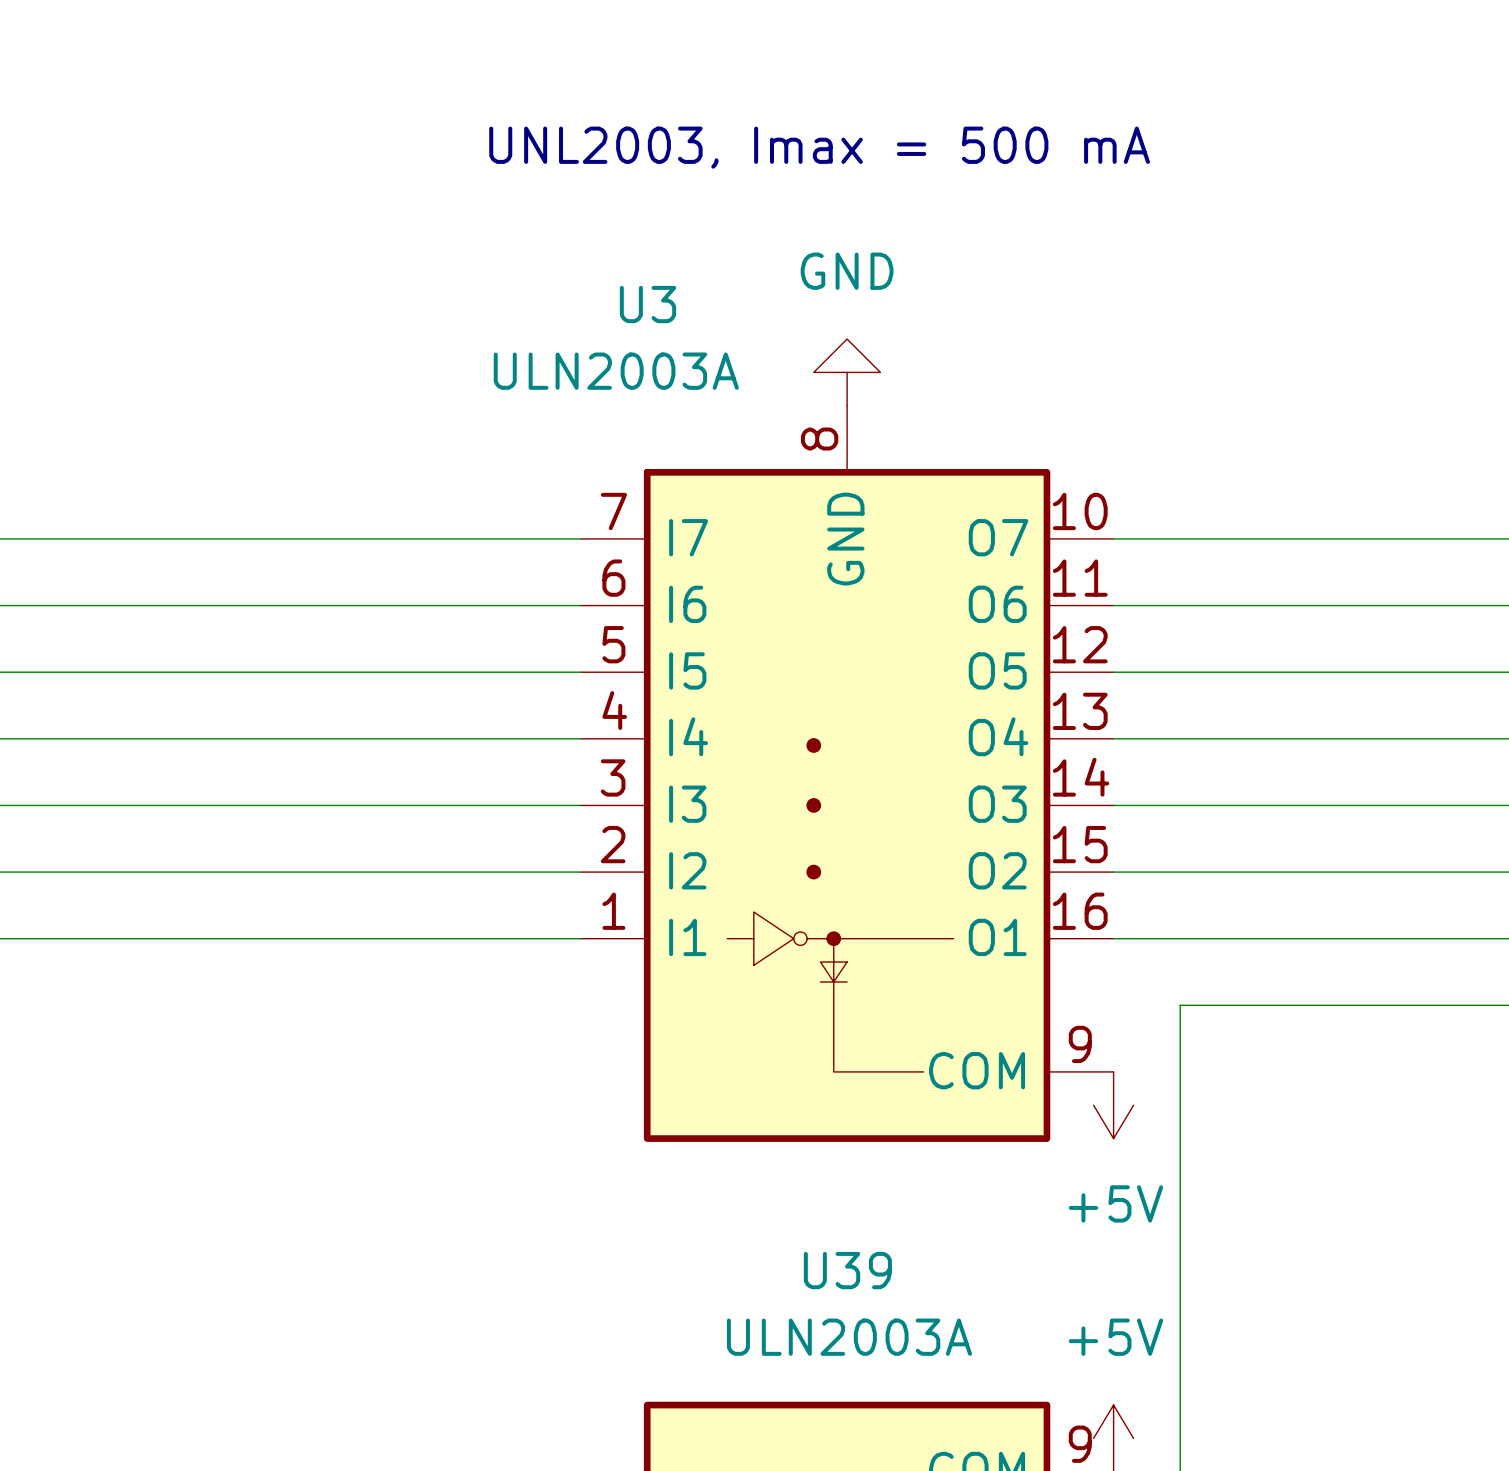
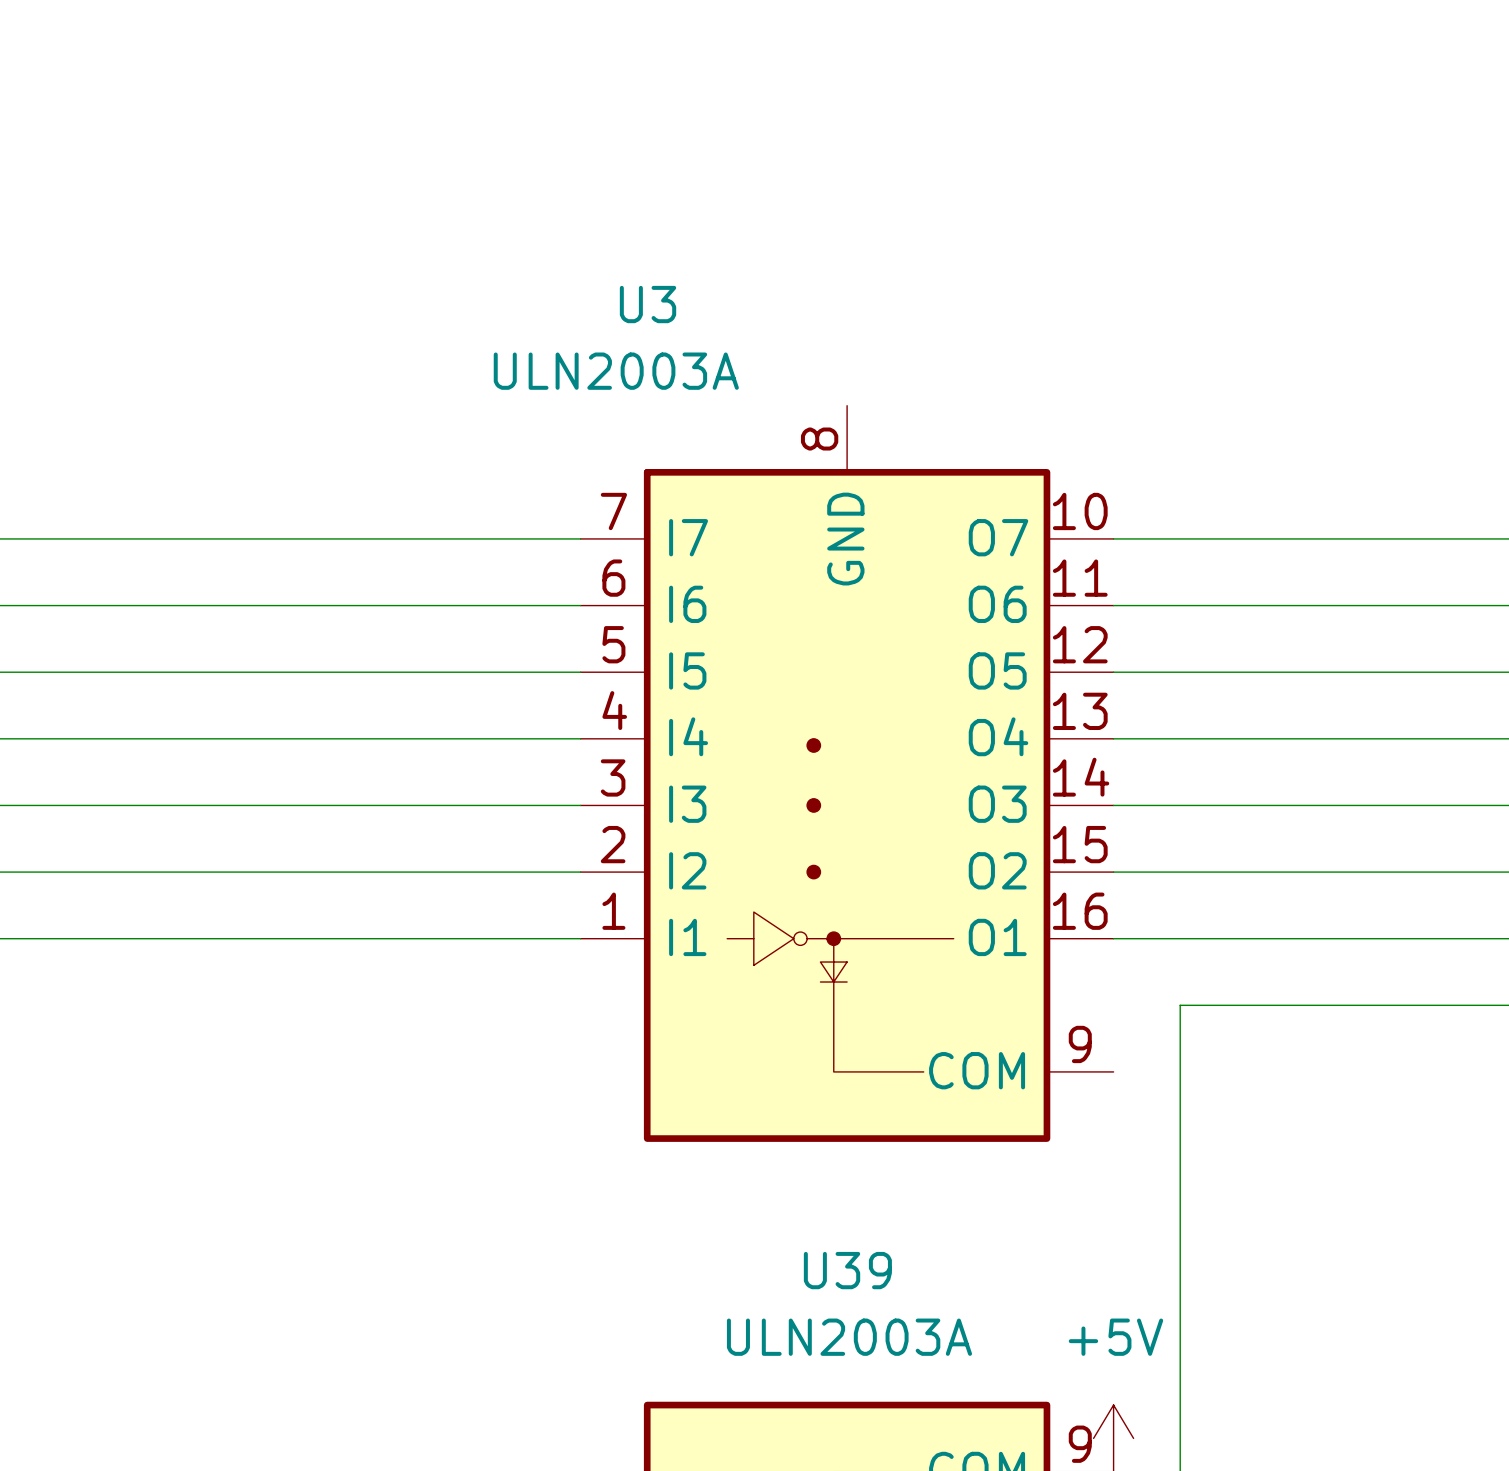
text: UNL2003, Imax = 500 mA (819, 147) -> none
power symbol: GND (847, 372) -> none
power symbol: +5V (1113, 1105) -> none

